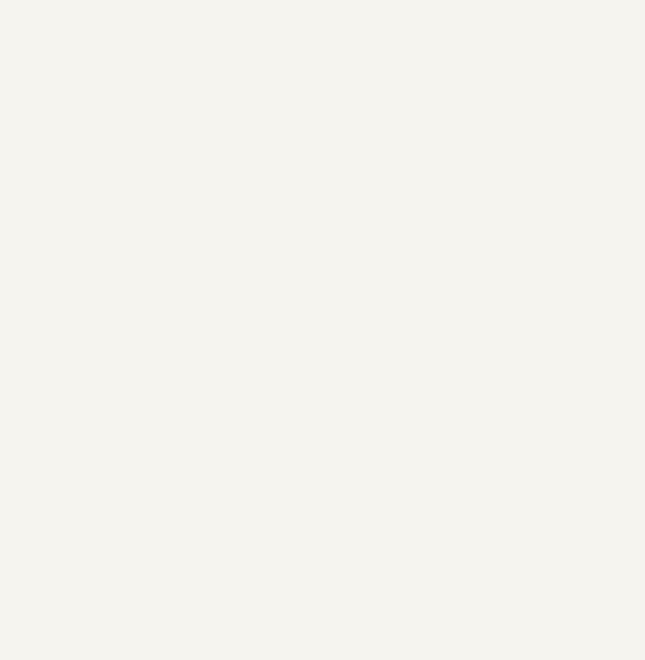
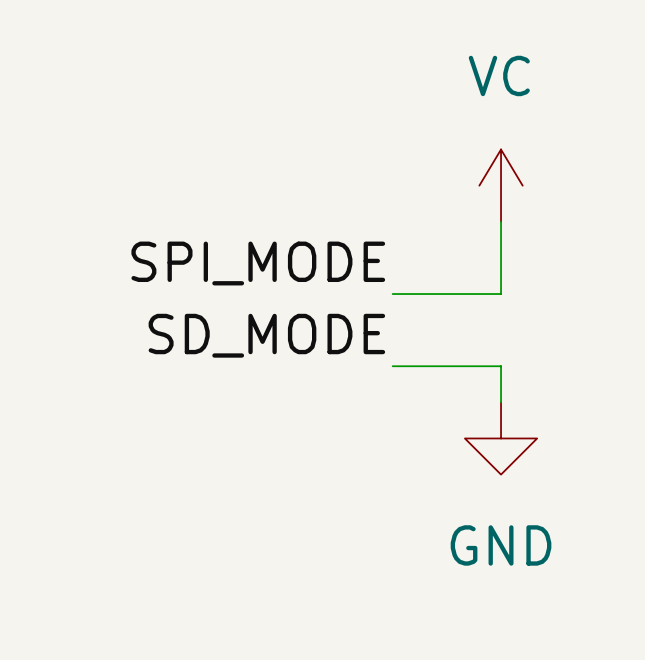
power symbol: none -> VC (501, 185)
wire: none -> (501, 221) (501, 294) (392, 294)
label: none -> SPI_MODE (258, 263)
label: none -> SD_MODE (266, 335)
wire: none -> (392, 366) (501, 366) (501, 402)
power symbol: none -> GND (501, 438)

